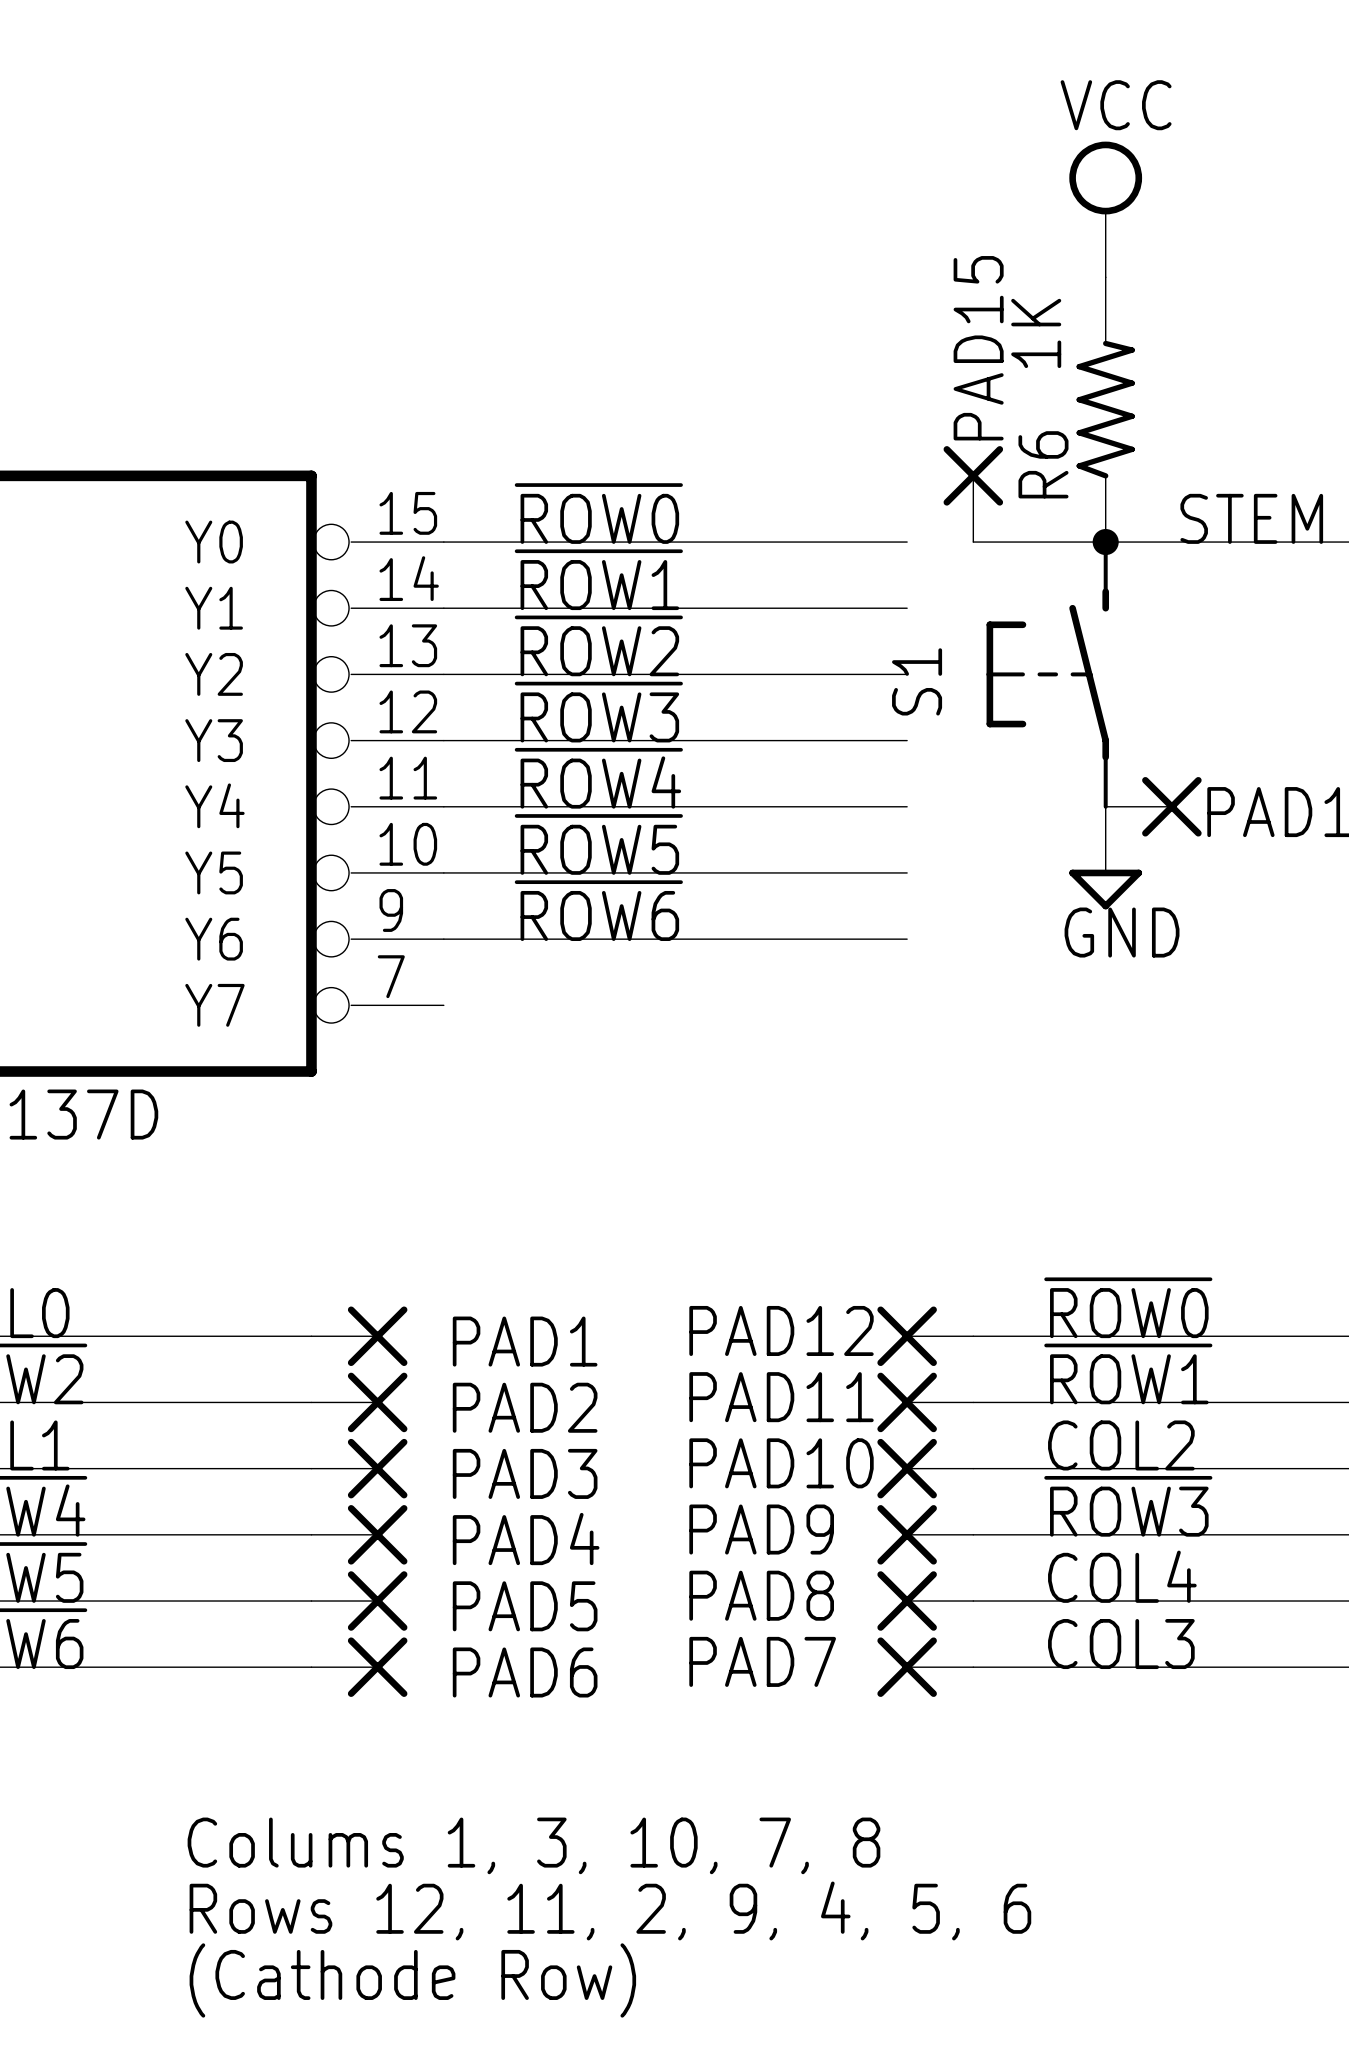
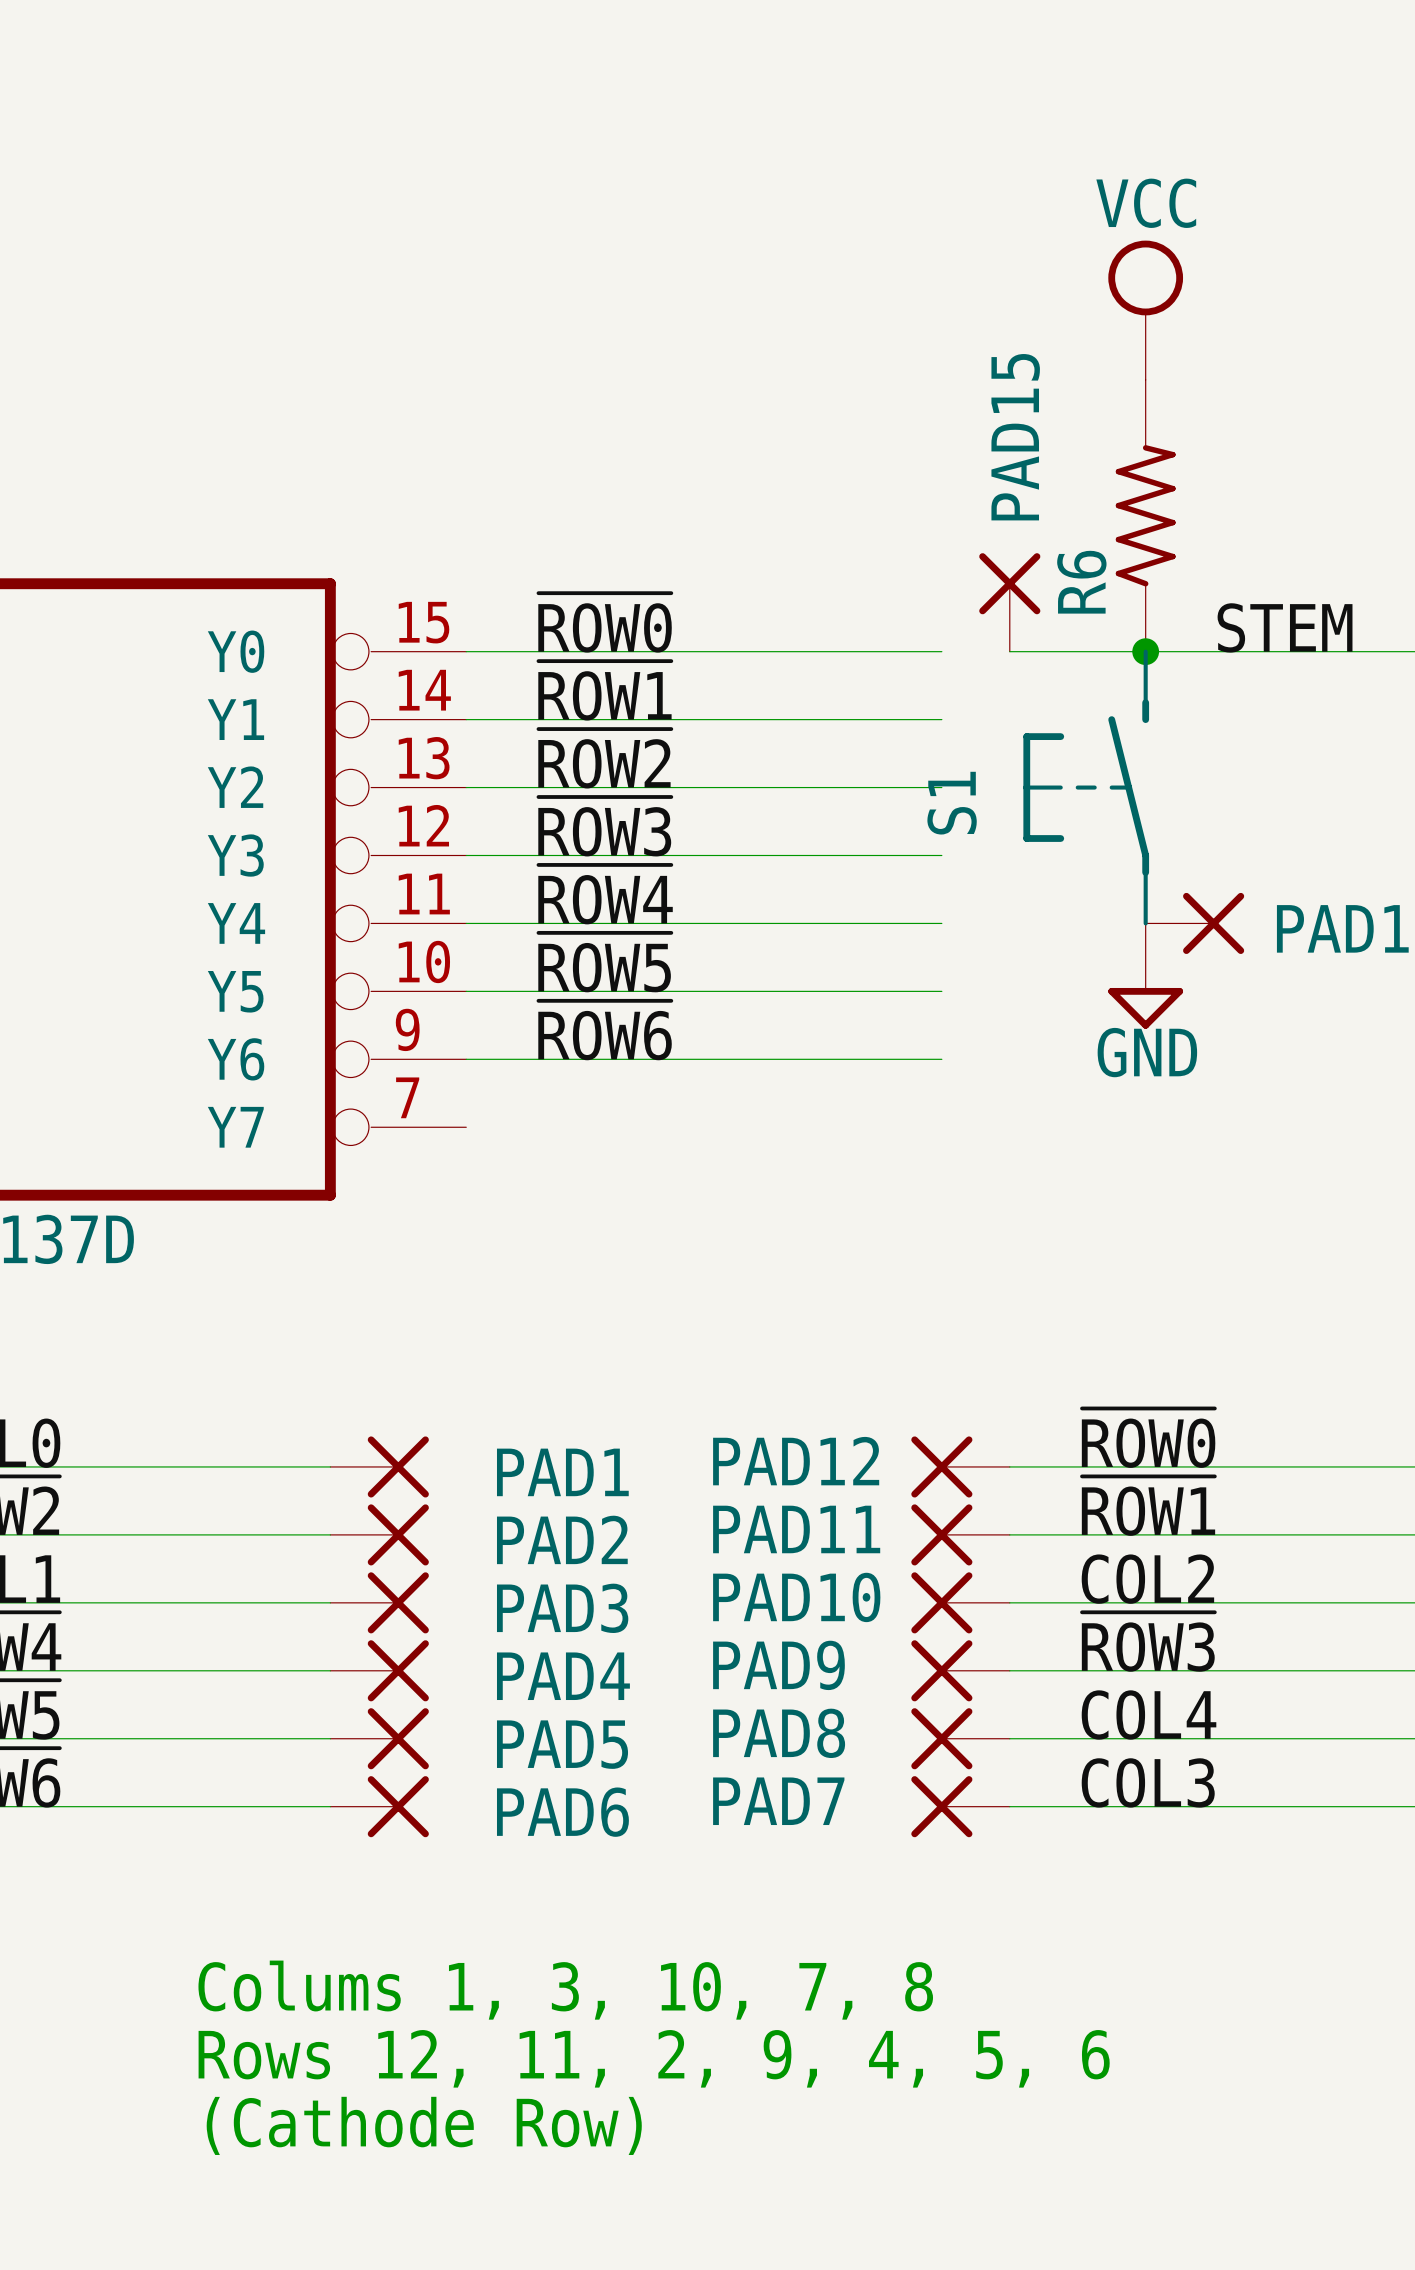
R6 value: 1K (1036, 333) -> none

